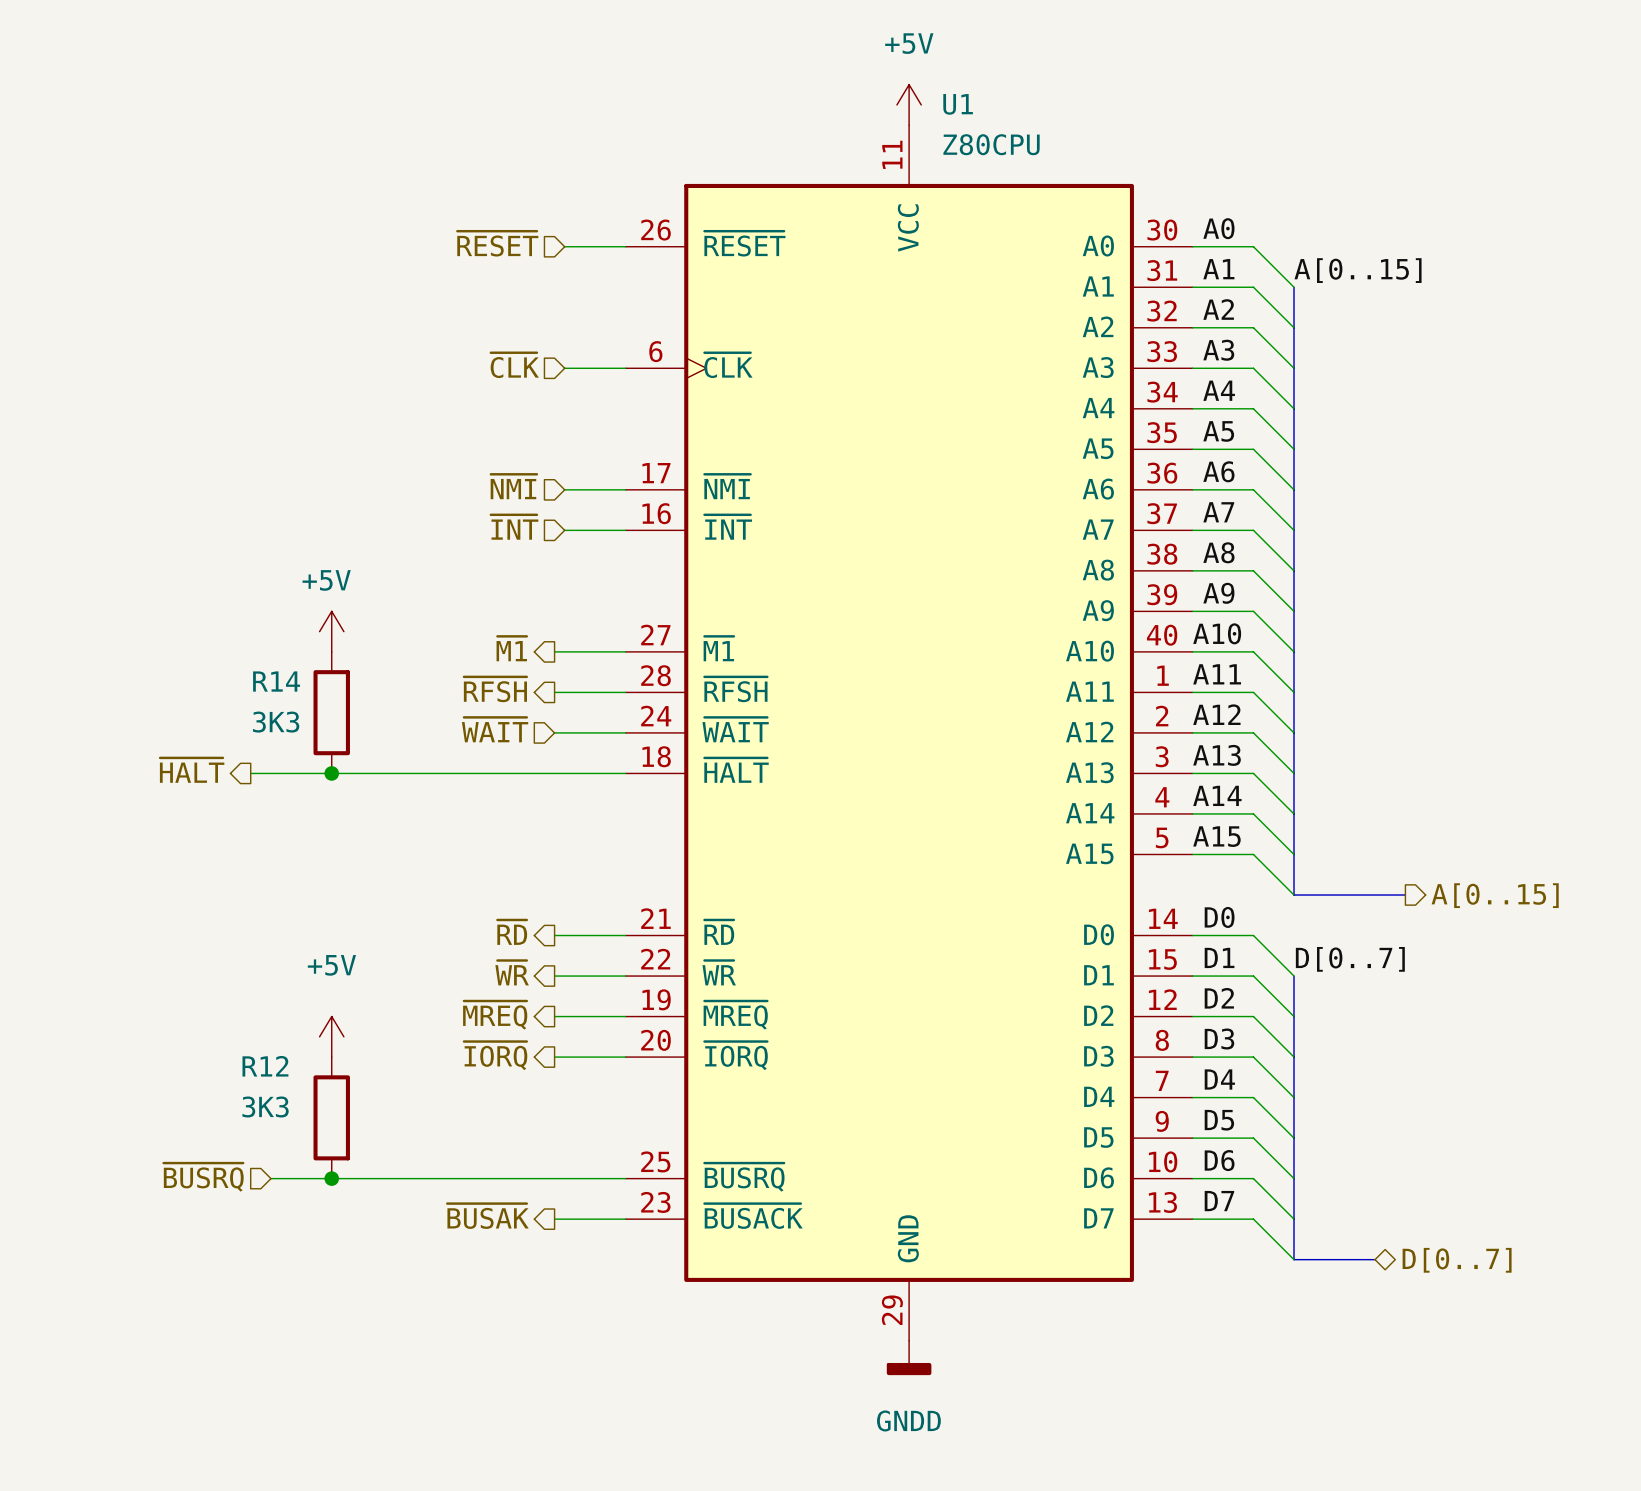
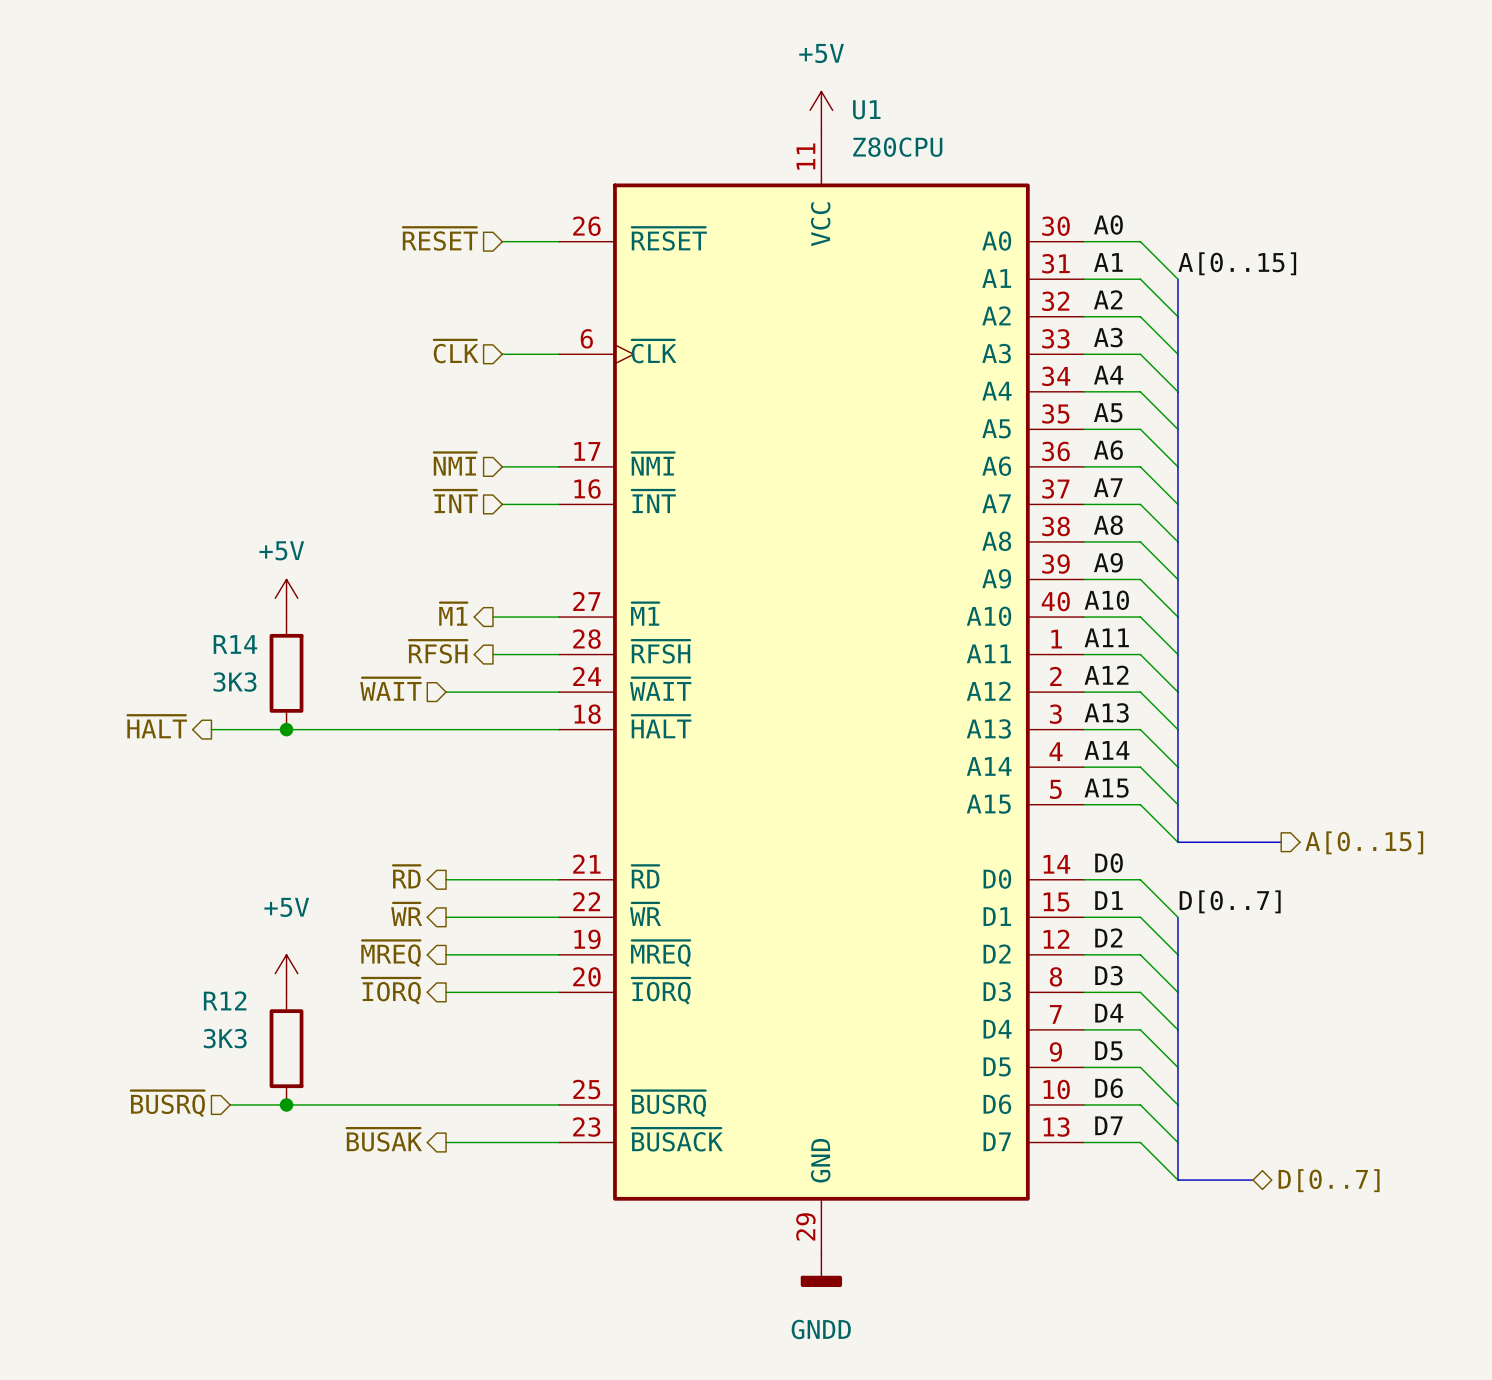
hierarchical label position: ~{WAIT} (495, 729) -> ~{WAIT} (390, 689)
wire: none -> (446, 692) (492, 692)
hierarchical label position: ~{RD} (512, 932) -> ~{RD} (406, 876)
wire: none -> (446, 879) (492, 879)
hierarchical label position: ~{WR} (512, 972) -> ~{WR} (406, 914)
wire: none -> (446, 917) (492, 917)
hierarchical label position: ~{MREQ} (495, 1015) -> ~{MREQ} (391, 953)
wire: none -> (446, 954) (492, 954)
hierarchical label position: ~{IORQ} (495, 1055) -> ~{IORQ} (391, 991)
wire: none -> (446, 992) (492, 992)
hierarchical label position: ~{BUSAK} (487, 1216) -> ~{BUSAK} (384, 1139)
wire: none -> (446, 1142) (492, 1142)

